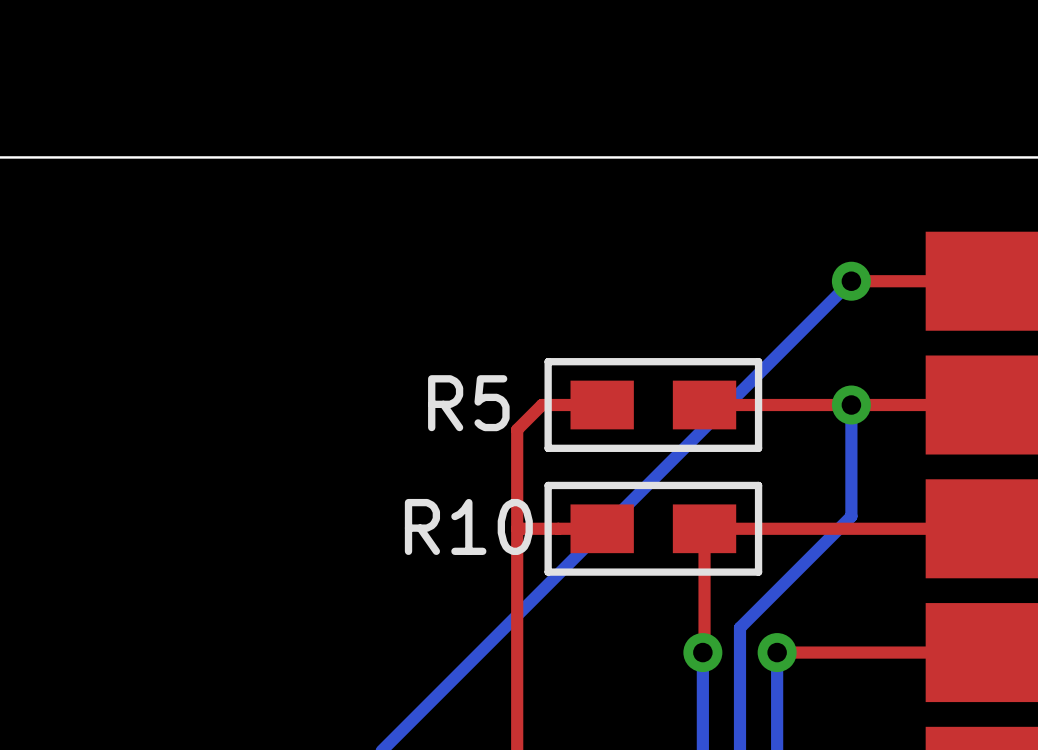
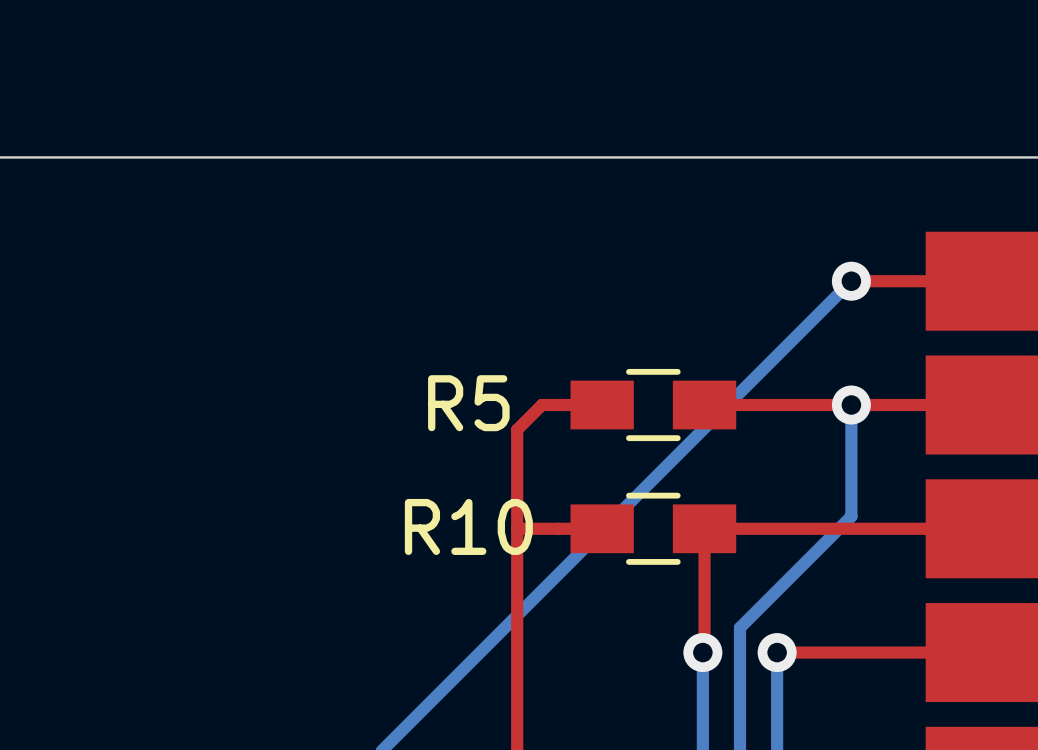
R5 footprint: [544, 358, 763, 452] -> [570, 368, 737, 442]
R10 footprint: [544, 481, 763, 576] -> [570, 492, 737, 565]

